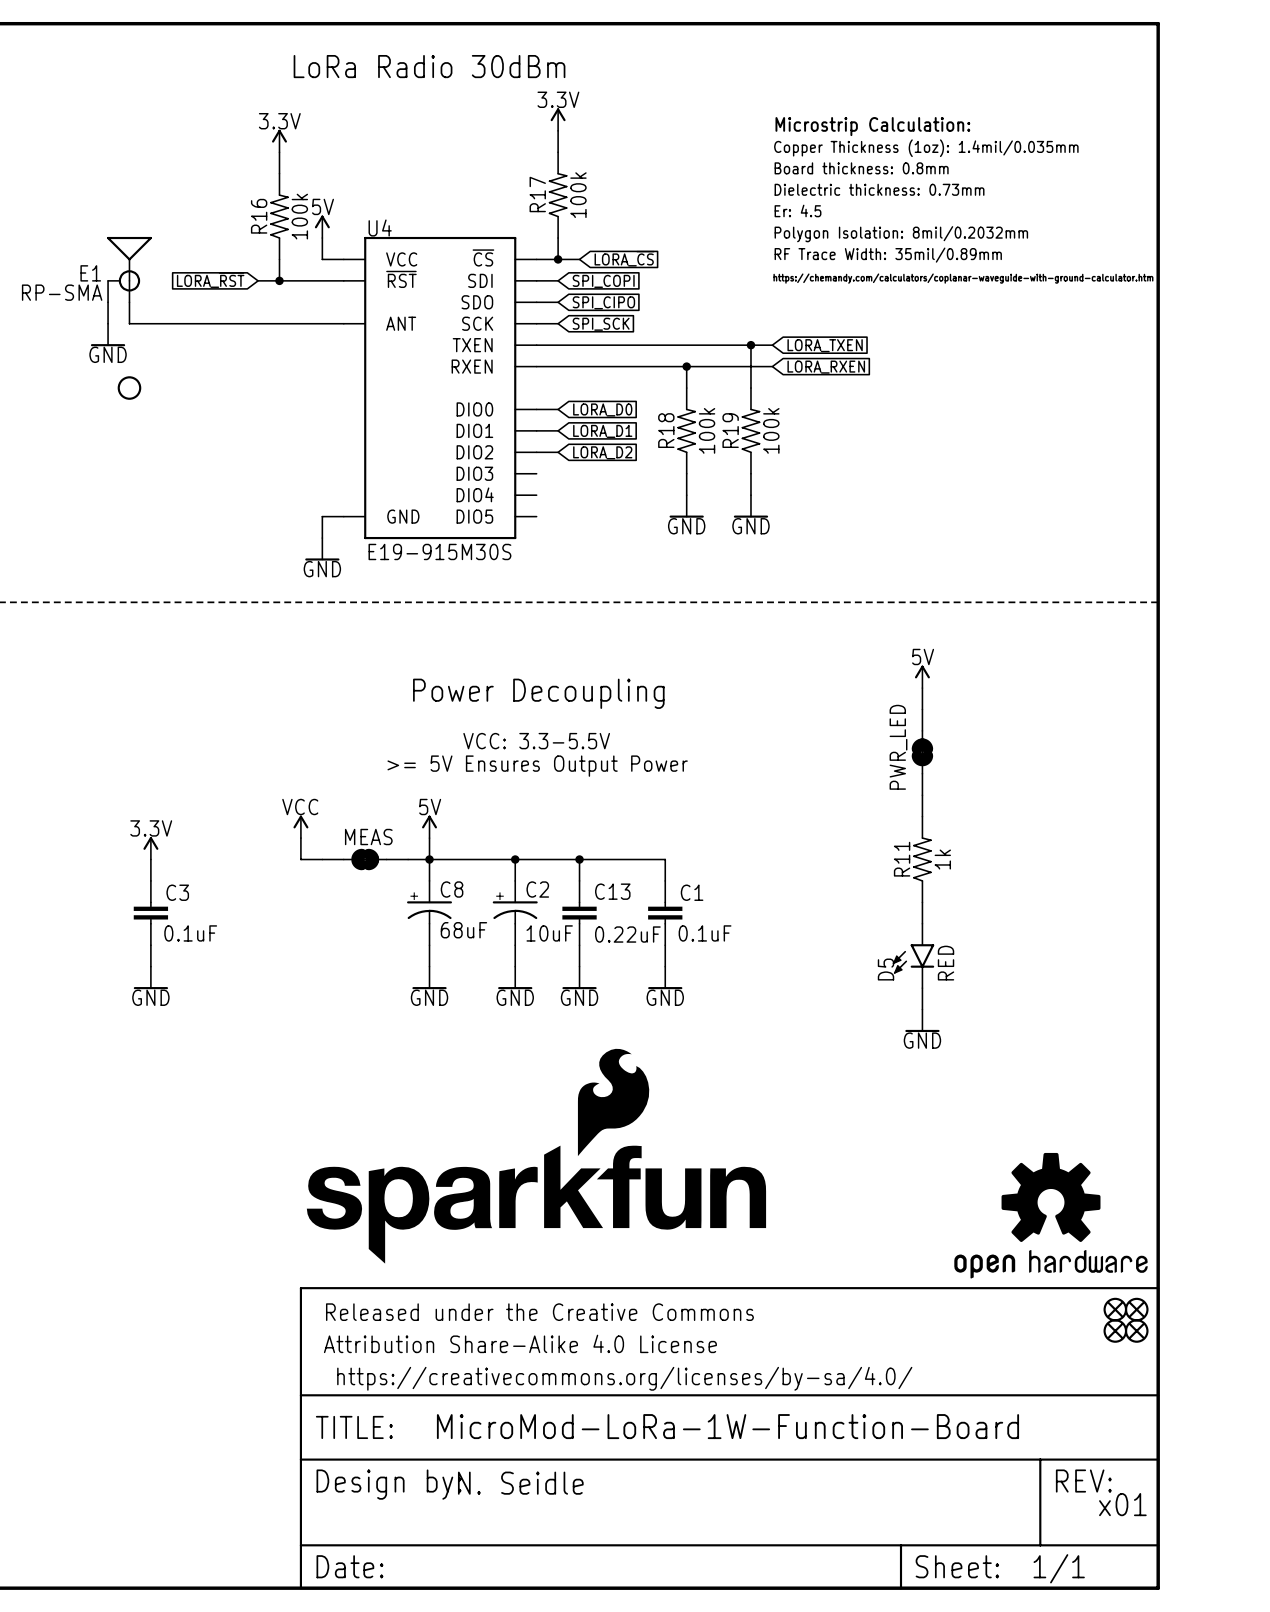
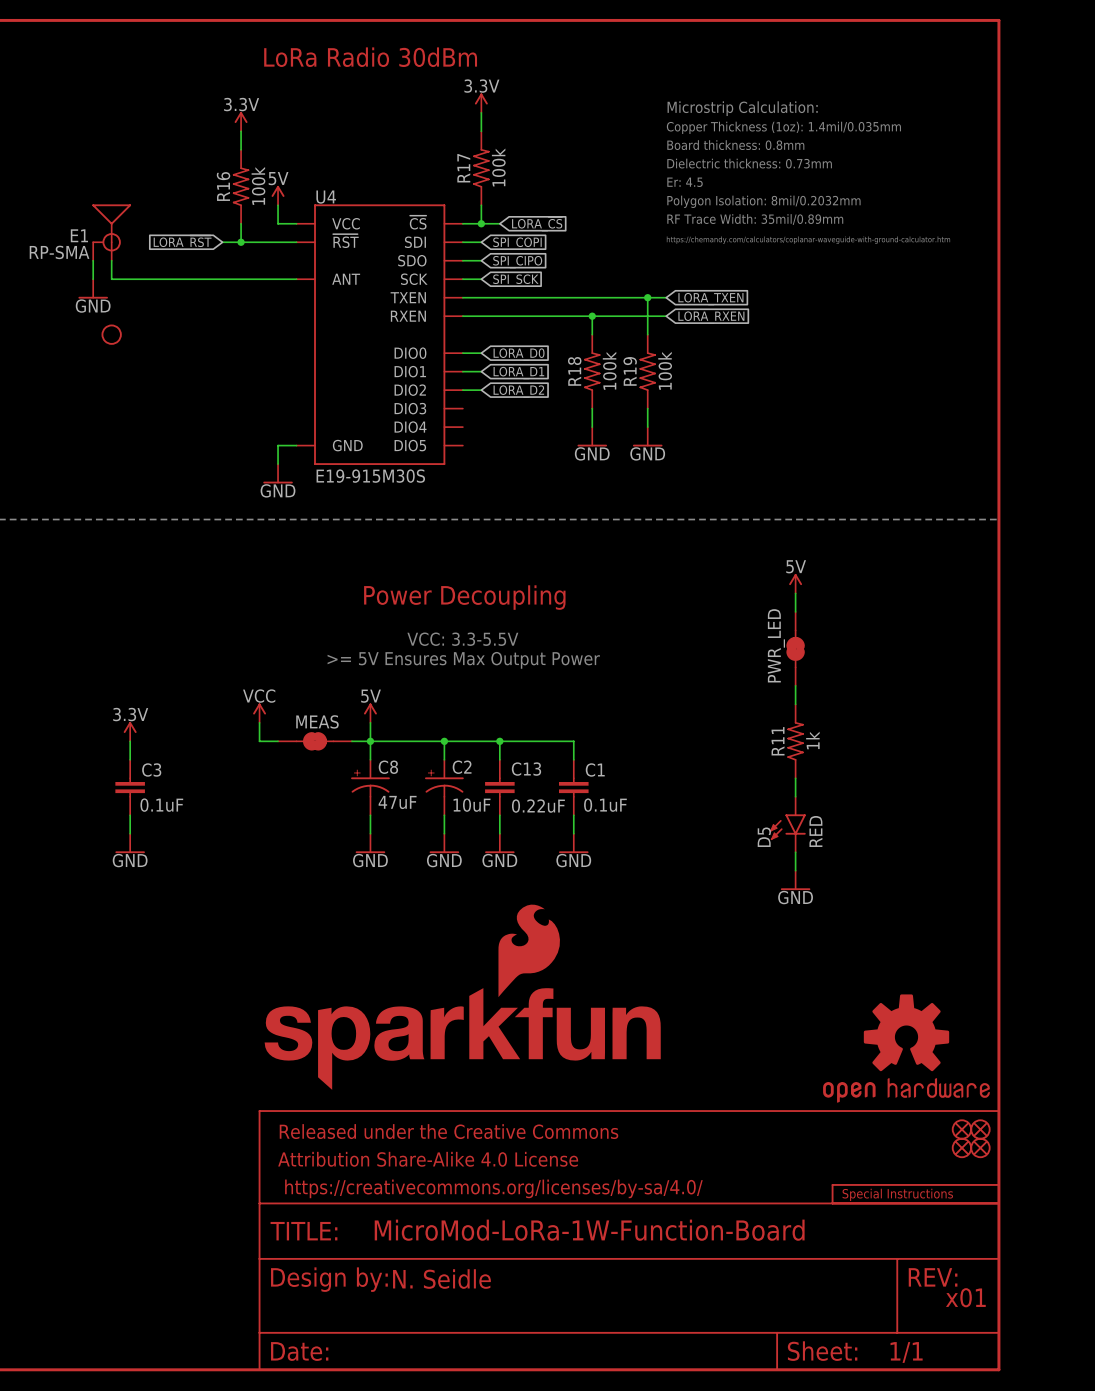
text: >= 5V Ensures Output Power (537, 766) -> >= 5V Ensures Max Output Power (463, 660)
C8 value: 68uF (463, 930) -> 47uF (397, 802)
part: none -> (915, 1194)

